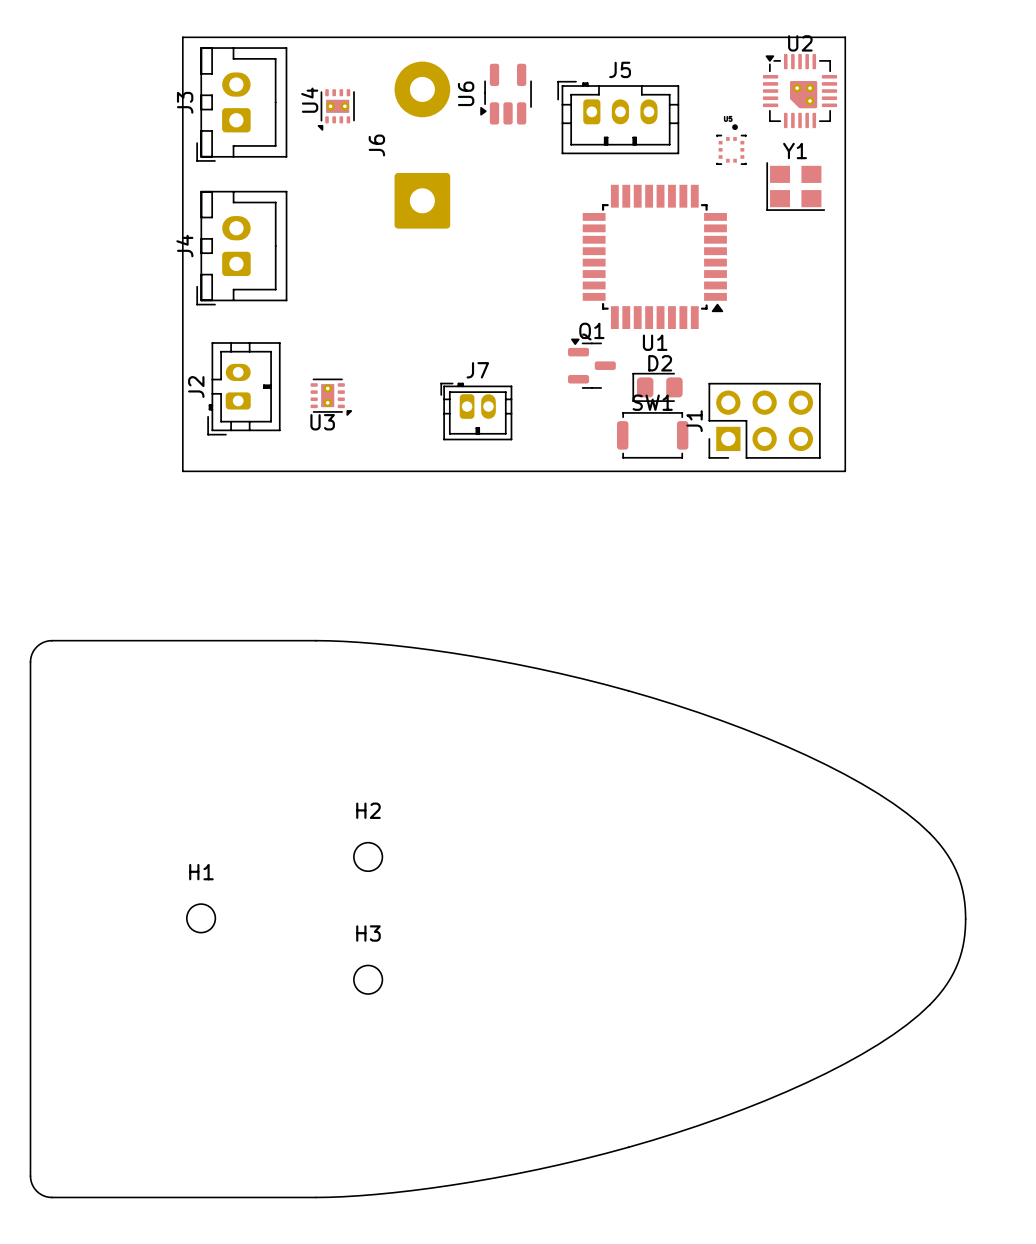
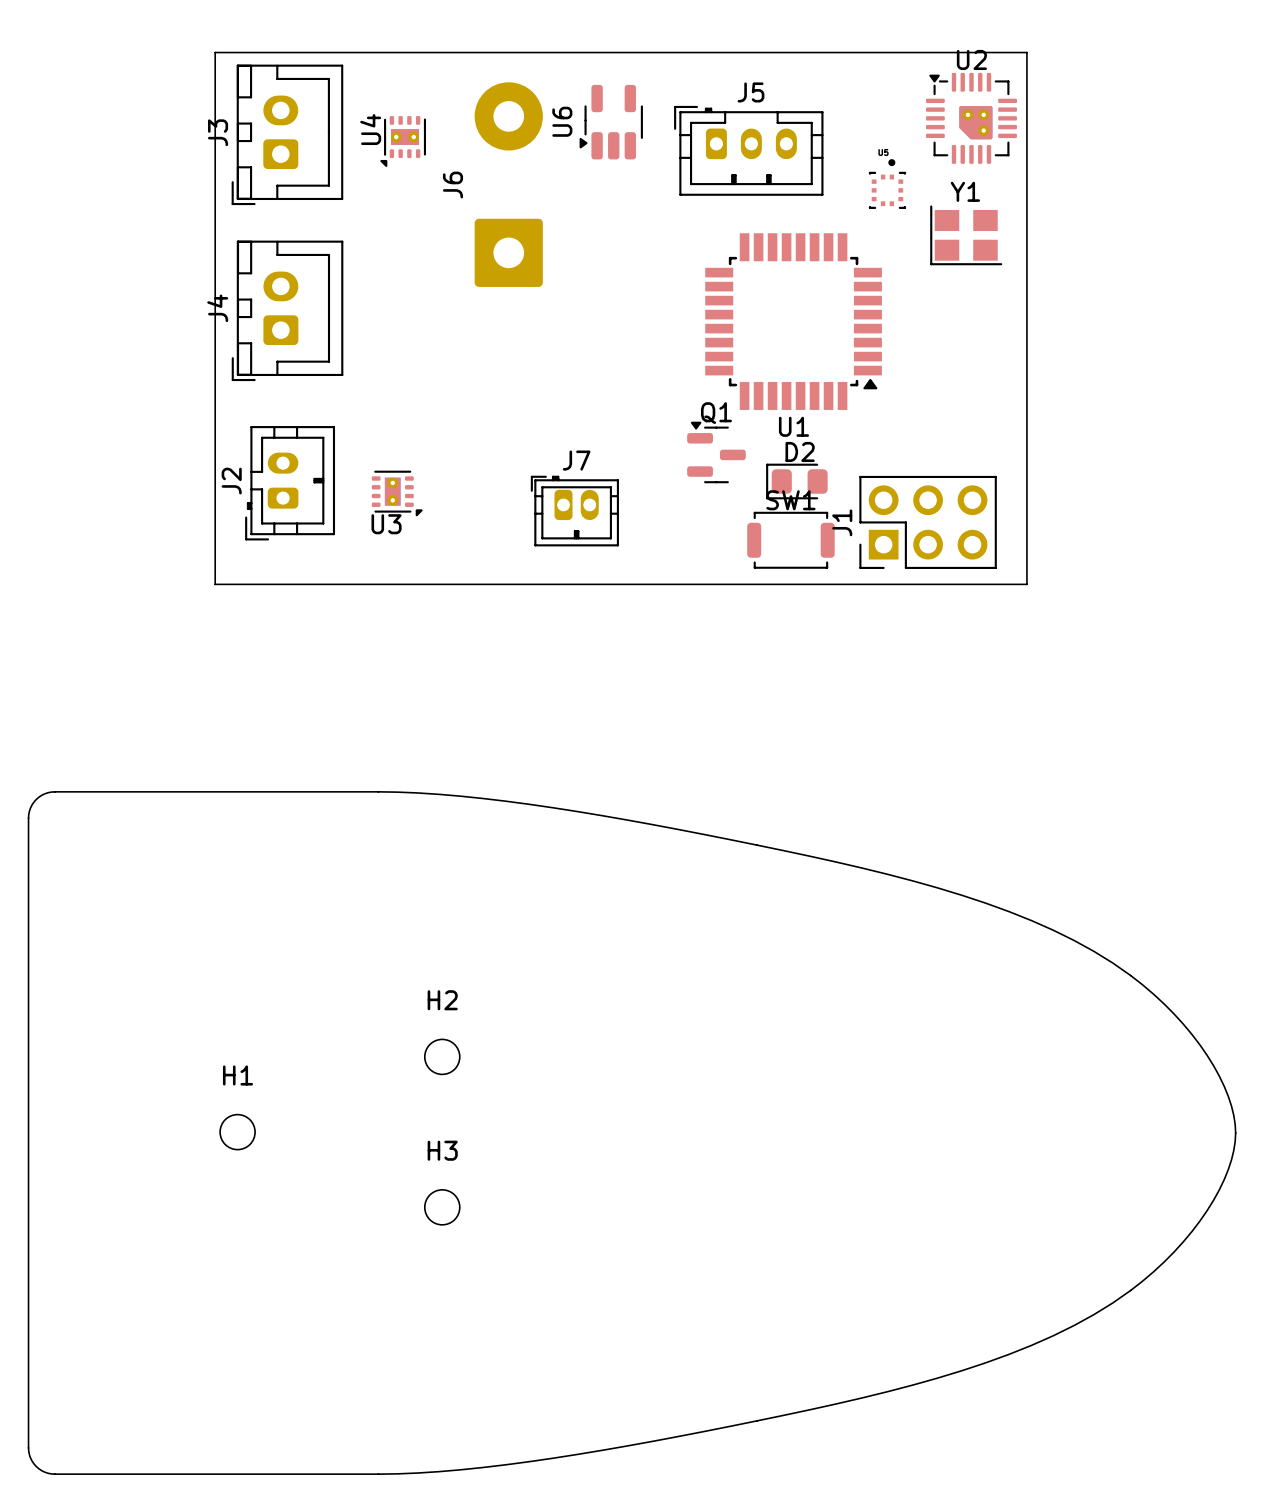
board edge: (316, 640) (375, 643) (431, 650) (559, 673) (675, 704) (786, 746) (844, 774) (878, 793) (907, 813) (929, 833) (947, 854) (958, 875) (963, 896) (965, 919) (963, 941) (958, 962) (947, 983) (929, 1004) (907, 1024) (878, 1044) (844, 1063) (786, 1091) (675, 1133) (559, 1164) (431, 1188) (375, 1194) (316, 1197) -> (378, 791) (438, 794) (505, 801) (679, 829) (887, 874) (962, 895) (1009, 911) (1053, 930) (1093, 951) (1130, 975) (1164, 1003) (1191, 1034) (1213, 1065) (1231, 1105) (1235, 1133) (1231, 1160) (1213, 1200) (1191, 1231) (1164, 1262) (1130, 1290) (1093, 1314) (1053, 1335) (1009, 1354) (962, 1370) (887, 1391) (679, 1436) (505, 1464) (438, 1471) (378, 1474)

